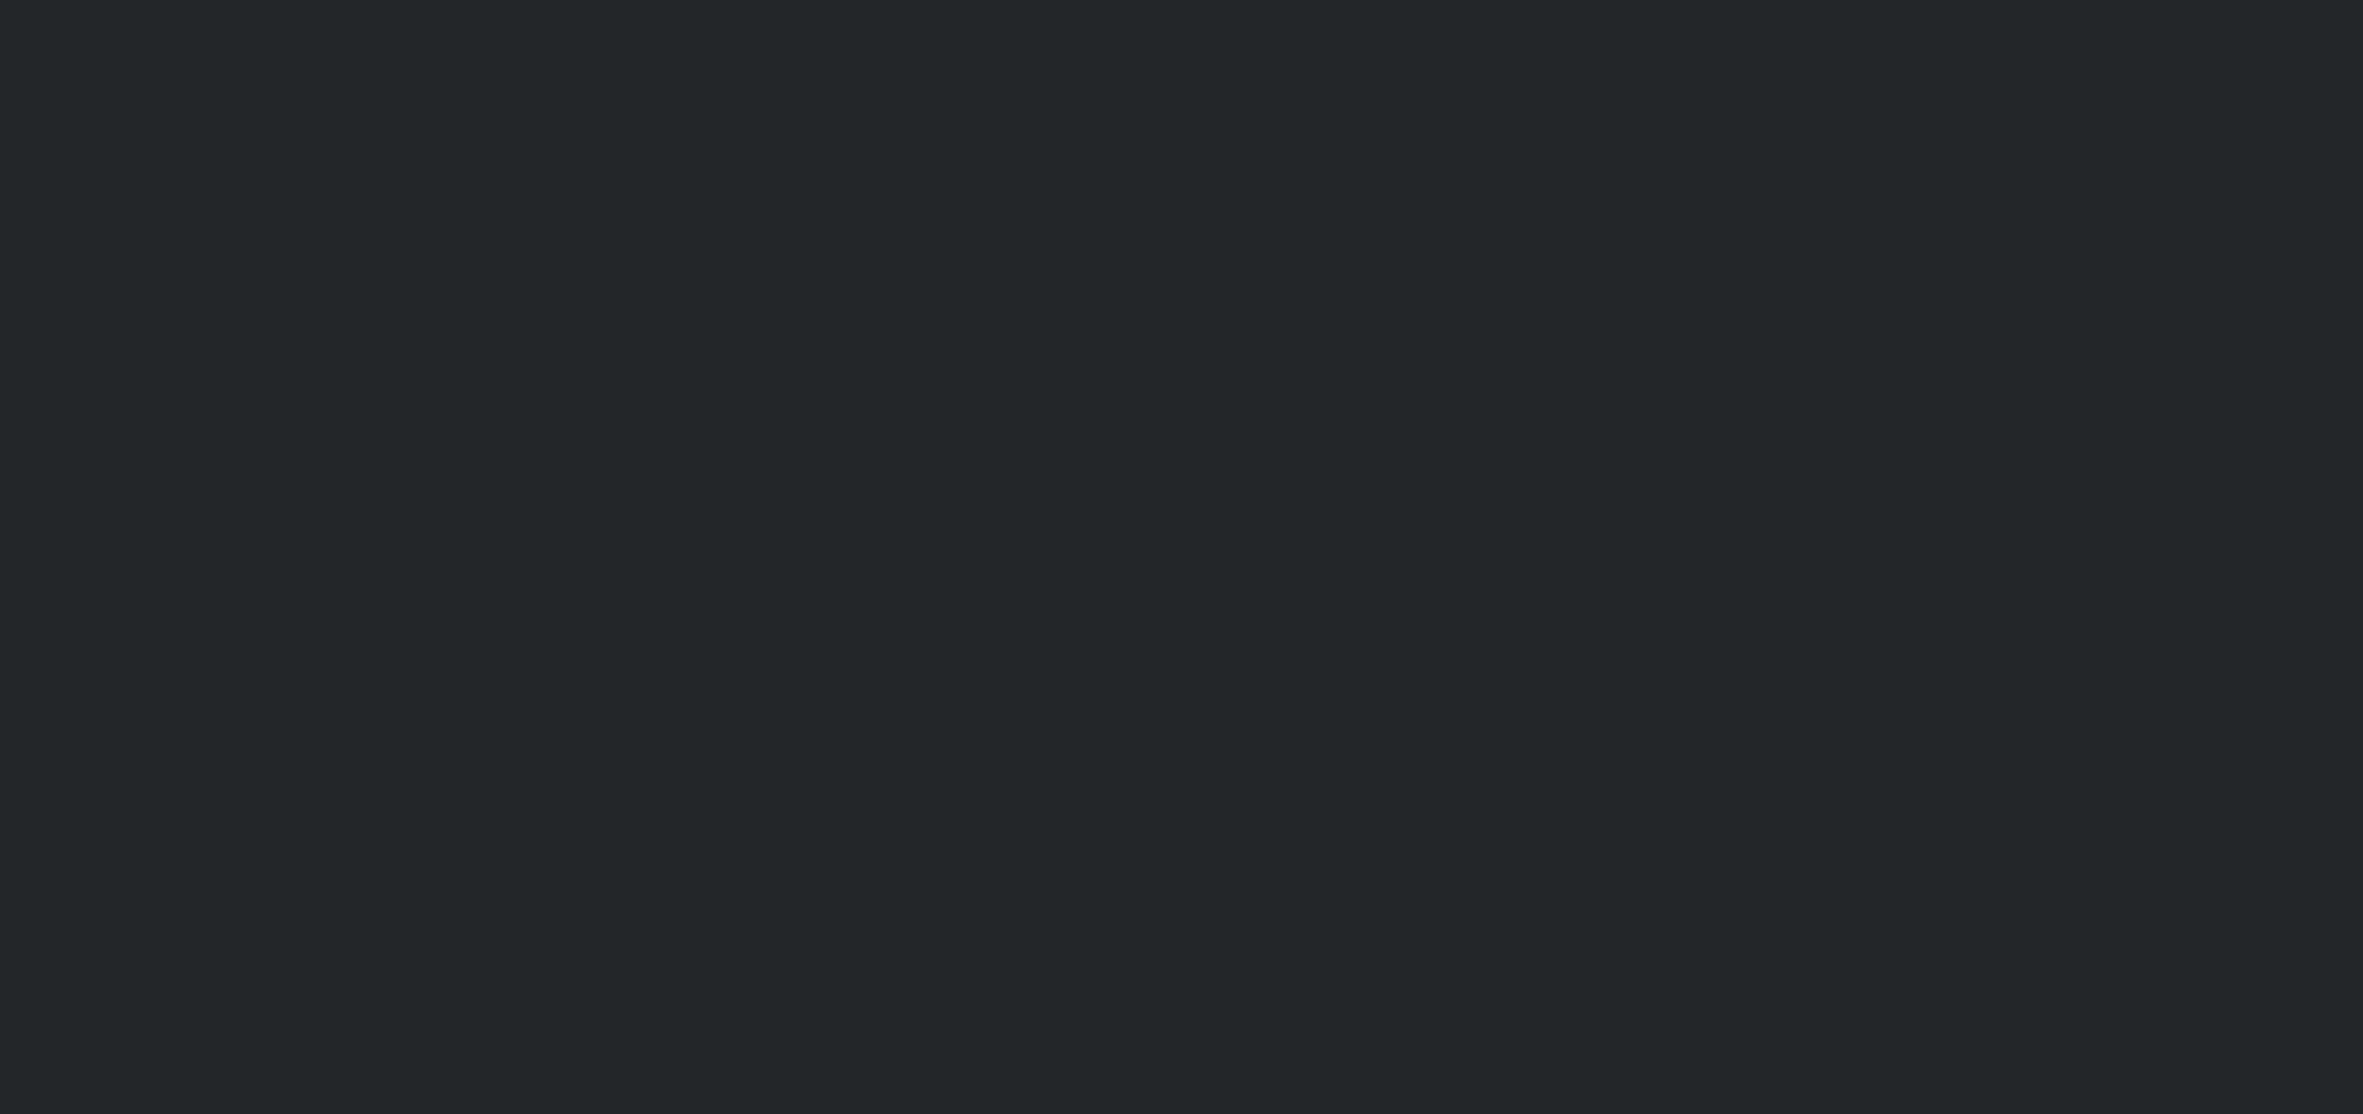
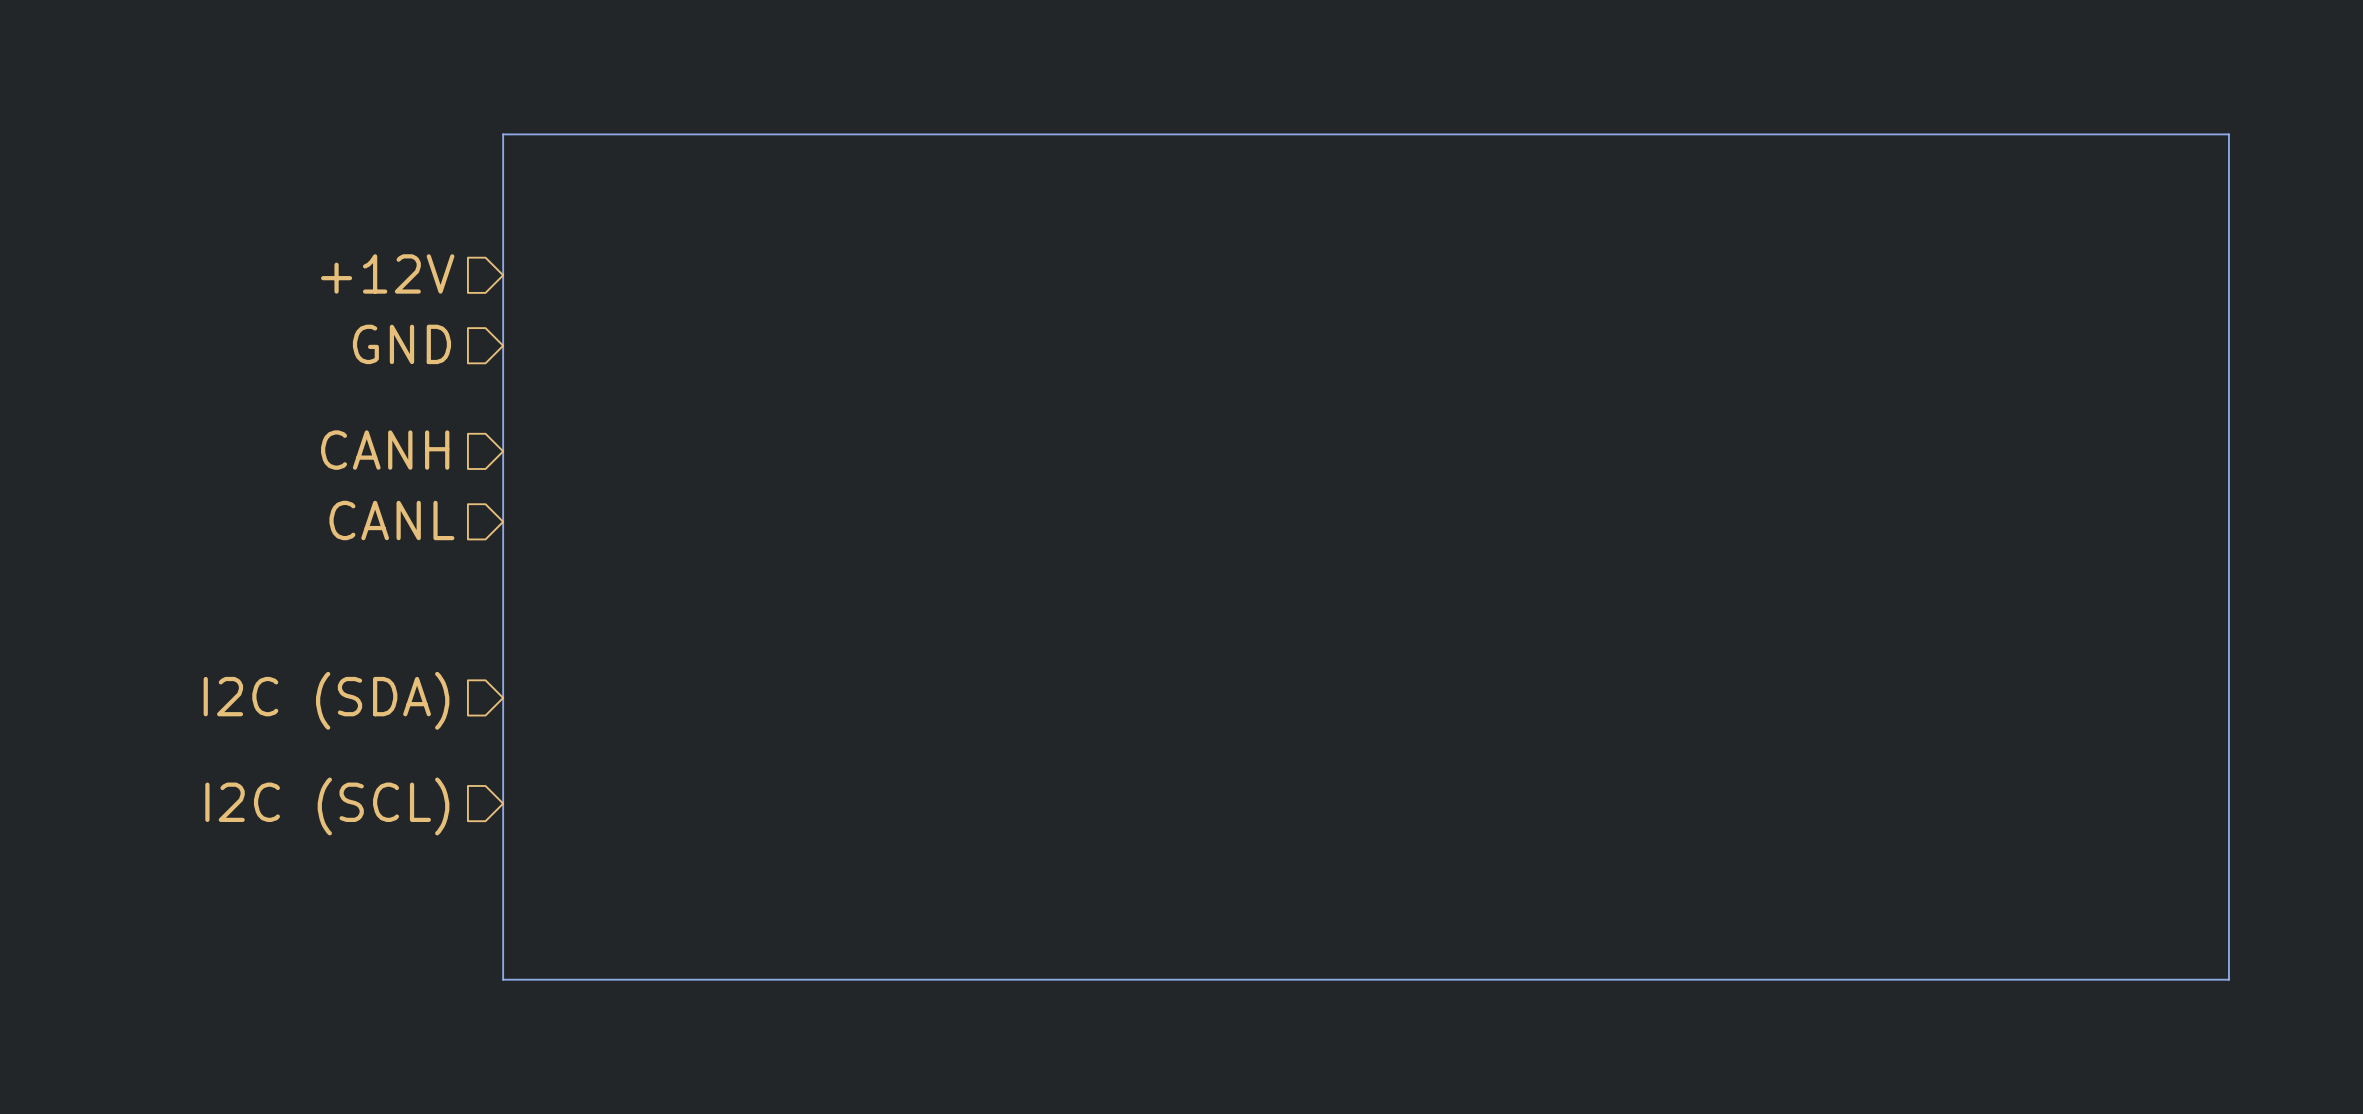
line: none -> (503, 134) (503, 979) (2228, 979) (2228, 134) (503, 134)
hierarchical label: none -> +12V (387, 273)
hierarchical label: none -> GND (401, 344)
hierarchical label: none -> CANH (385, 450)
hierarchical label: none -> CANL (391, 520)
hierarchical label: none -> I2C (SDA) (326, 700)
hierarchical label: none -> I2C (SCL) (327, 806)

